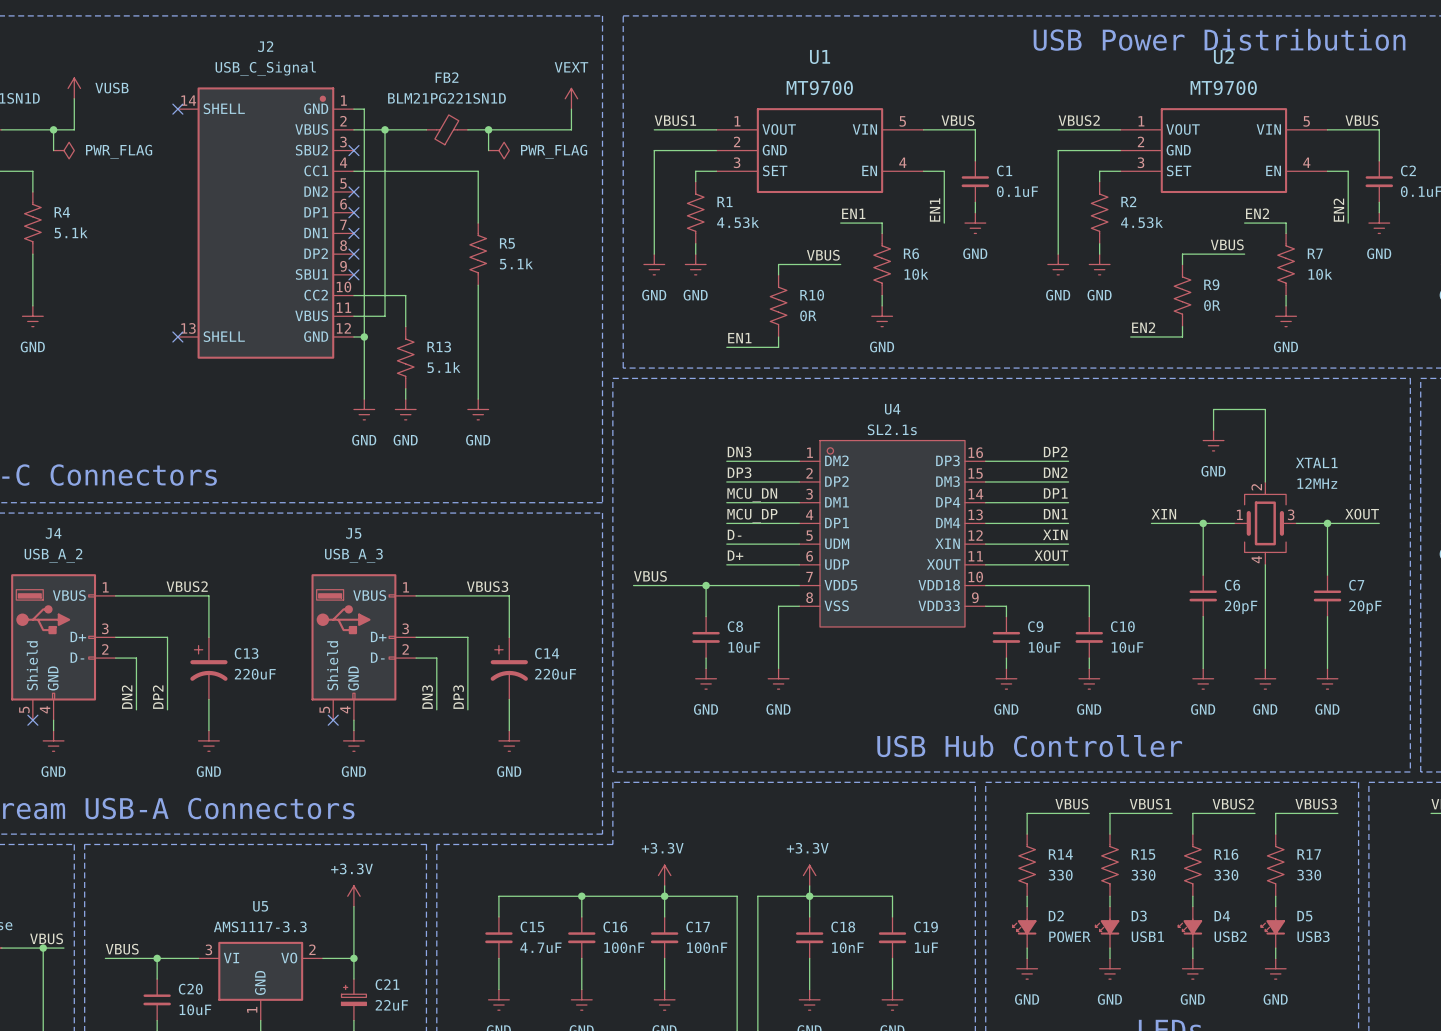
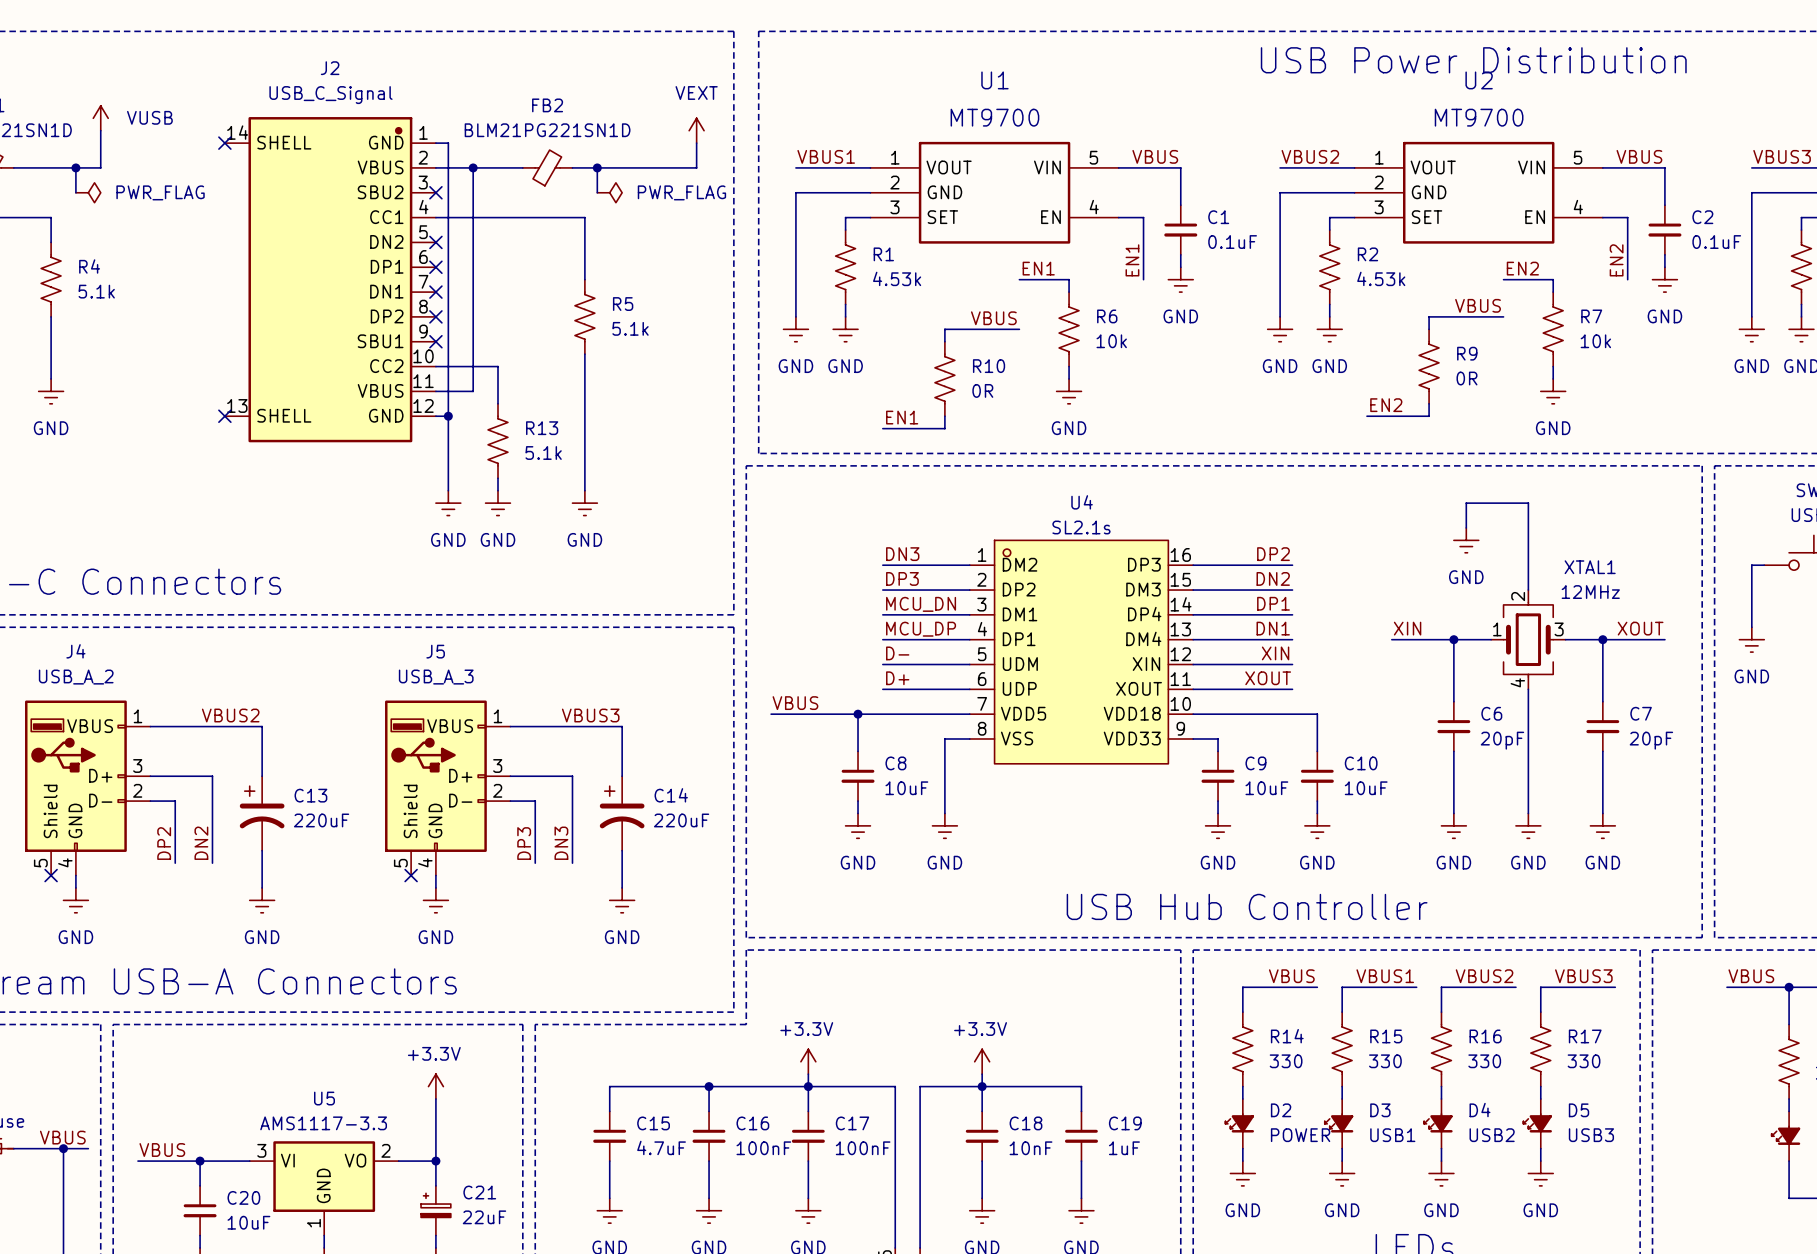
label: DN2 (127, 697) -> DP2 (164, 843)
label: DP2 (158, 697) -> DN2 (201, 843)
label: DN3 (427, 697) -> DP3 (524, 843)
label: DP3 (458, 697) -> DN3 (561, 843)

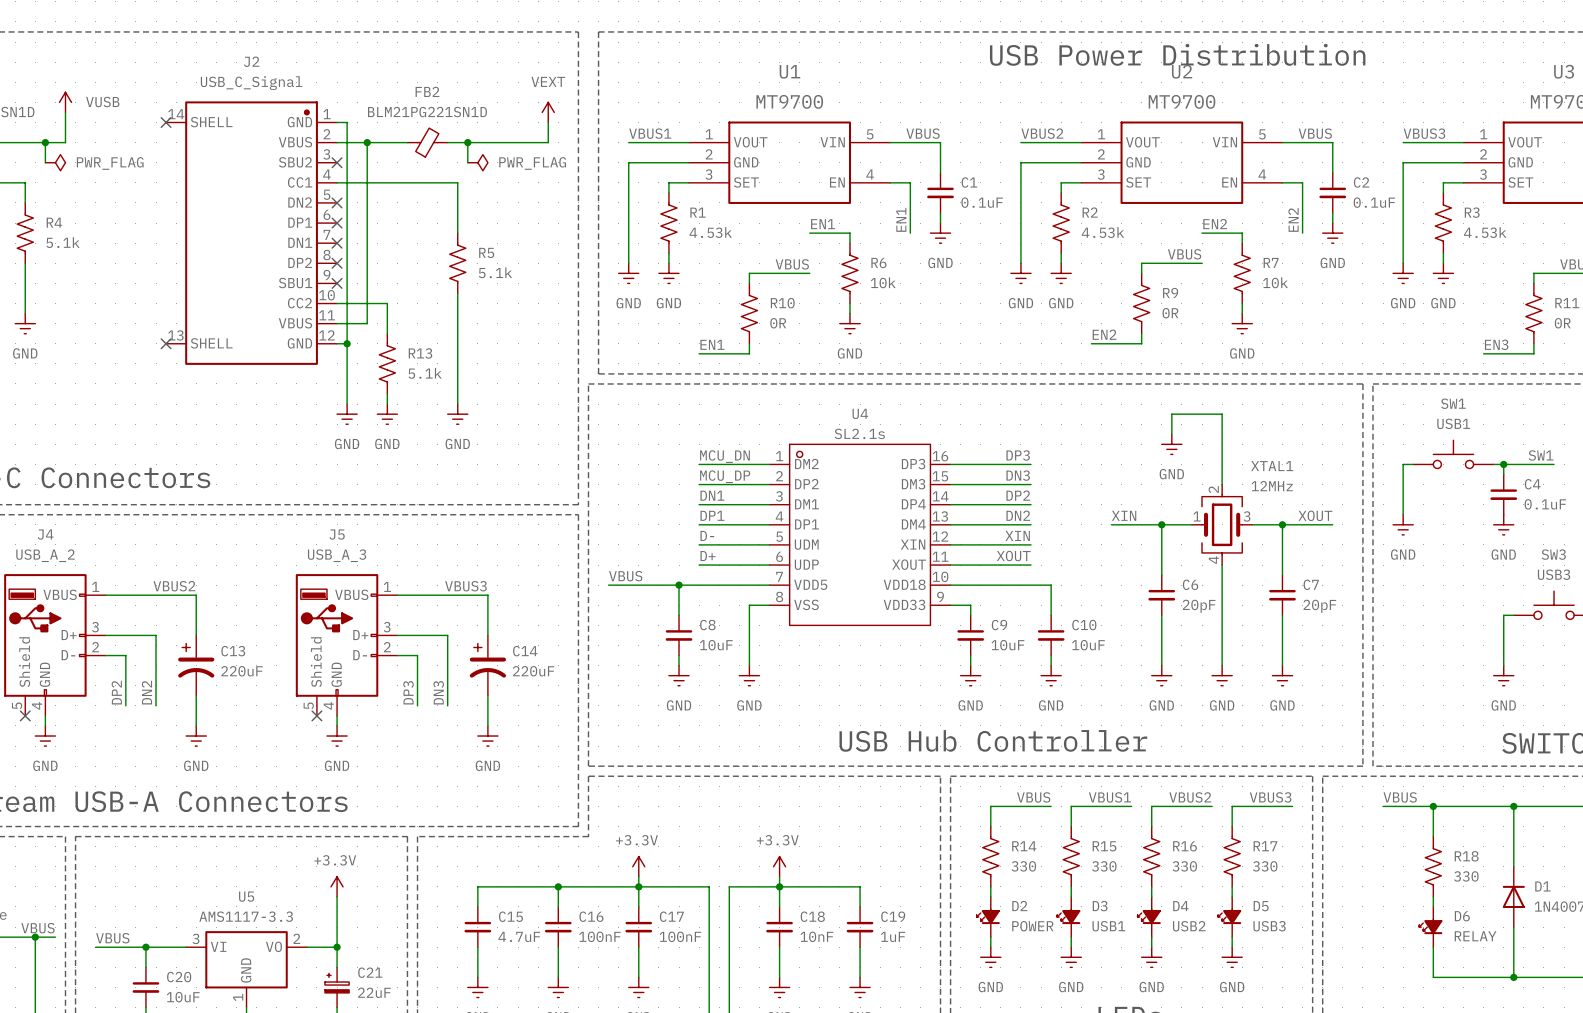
label: DN3 (902, 554) -> MCU_DN (724, 456)
label: DP2 (1273, 554) -> DP3 (1018, 455)
label: DP3 (902, 578) -> MCU_DP (725, 476)
label: DN2 (1273, 578) -> DN3 (1018, 475)
label: DP1 (1273, 603) -> DP2 (1018, 495)
label: MCU_DN (921, 604) -> DN1 (712, 495)
label: DN1 (1273, 628) -> DN2 (1018, 515)
label: MCU_DP (921, 629) -> DP1 (712, 515)

